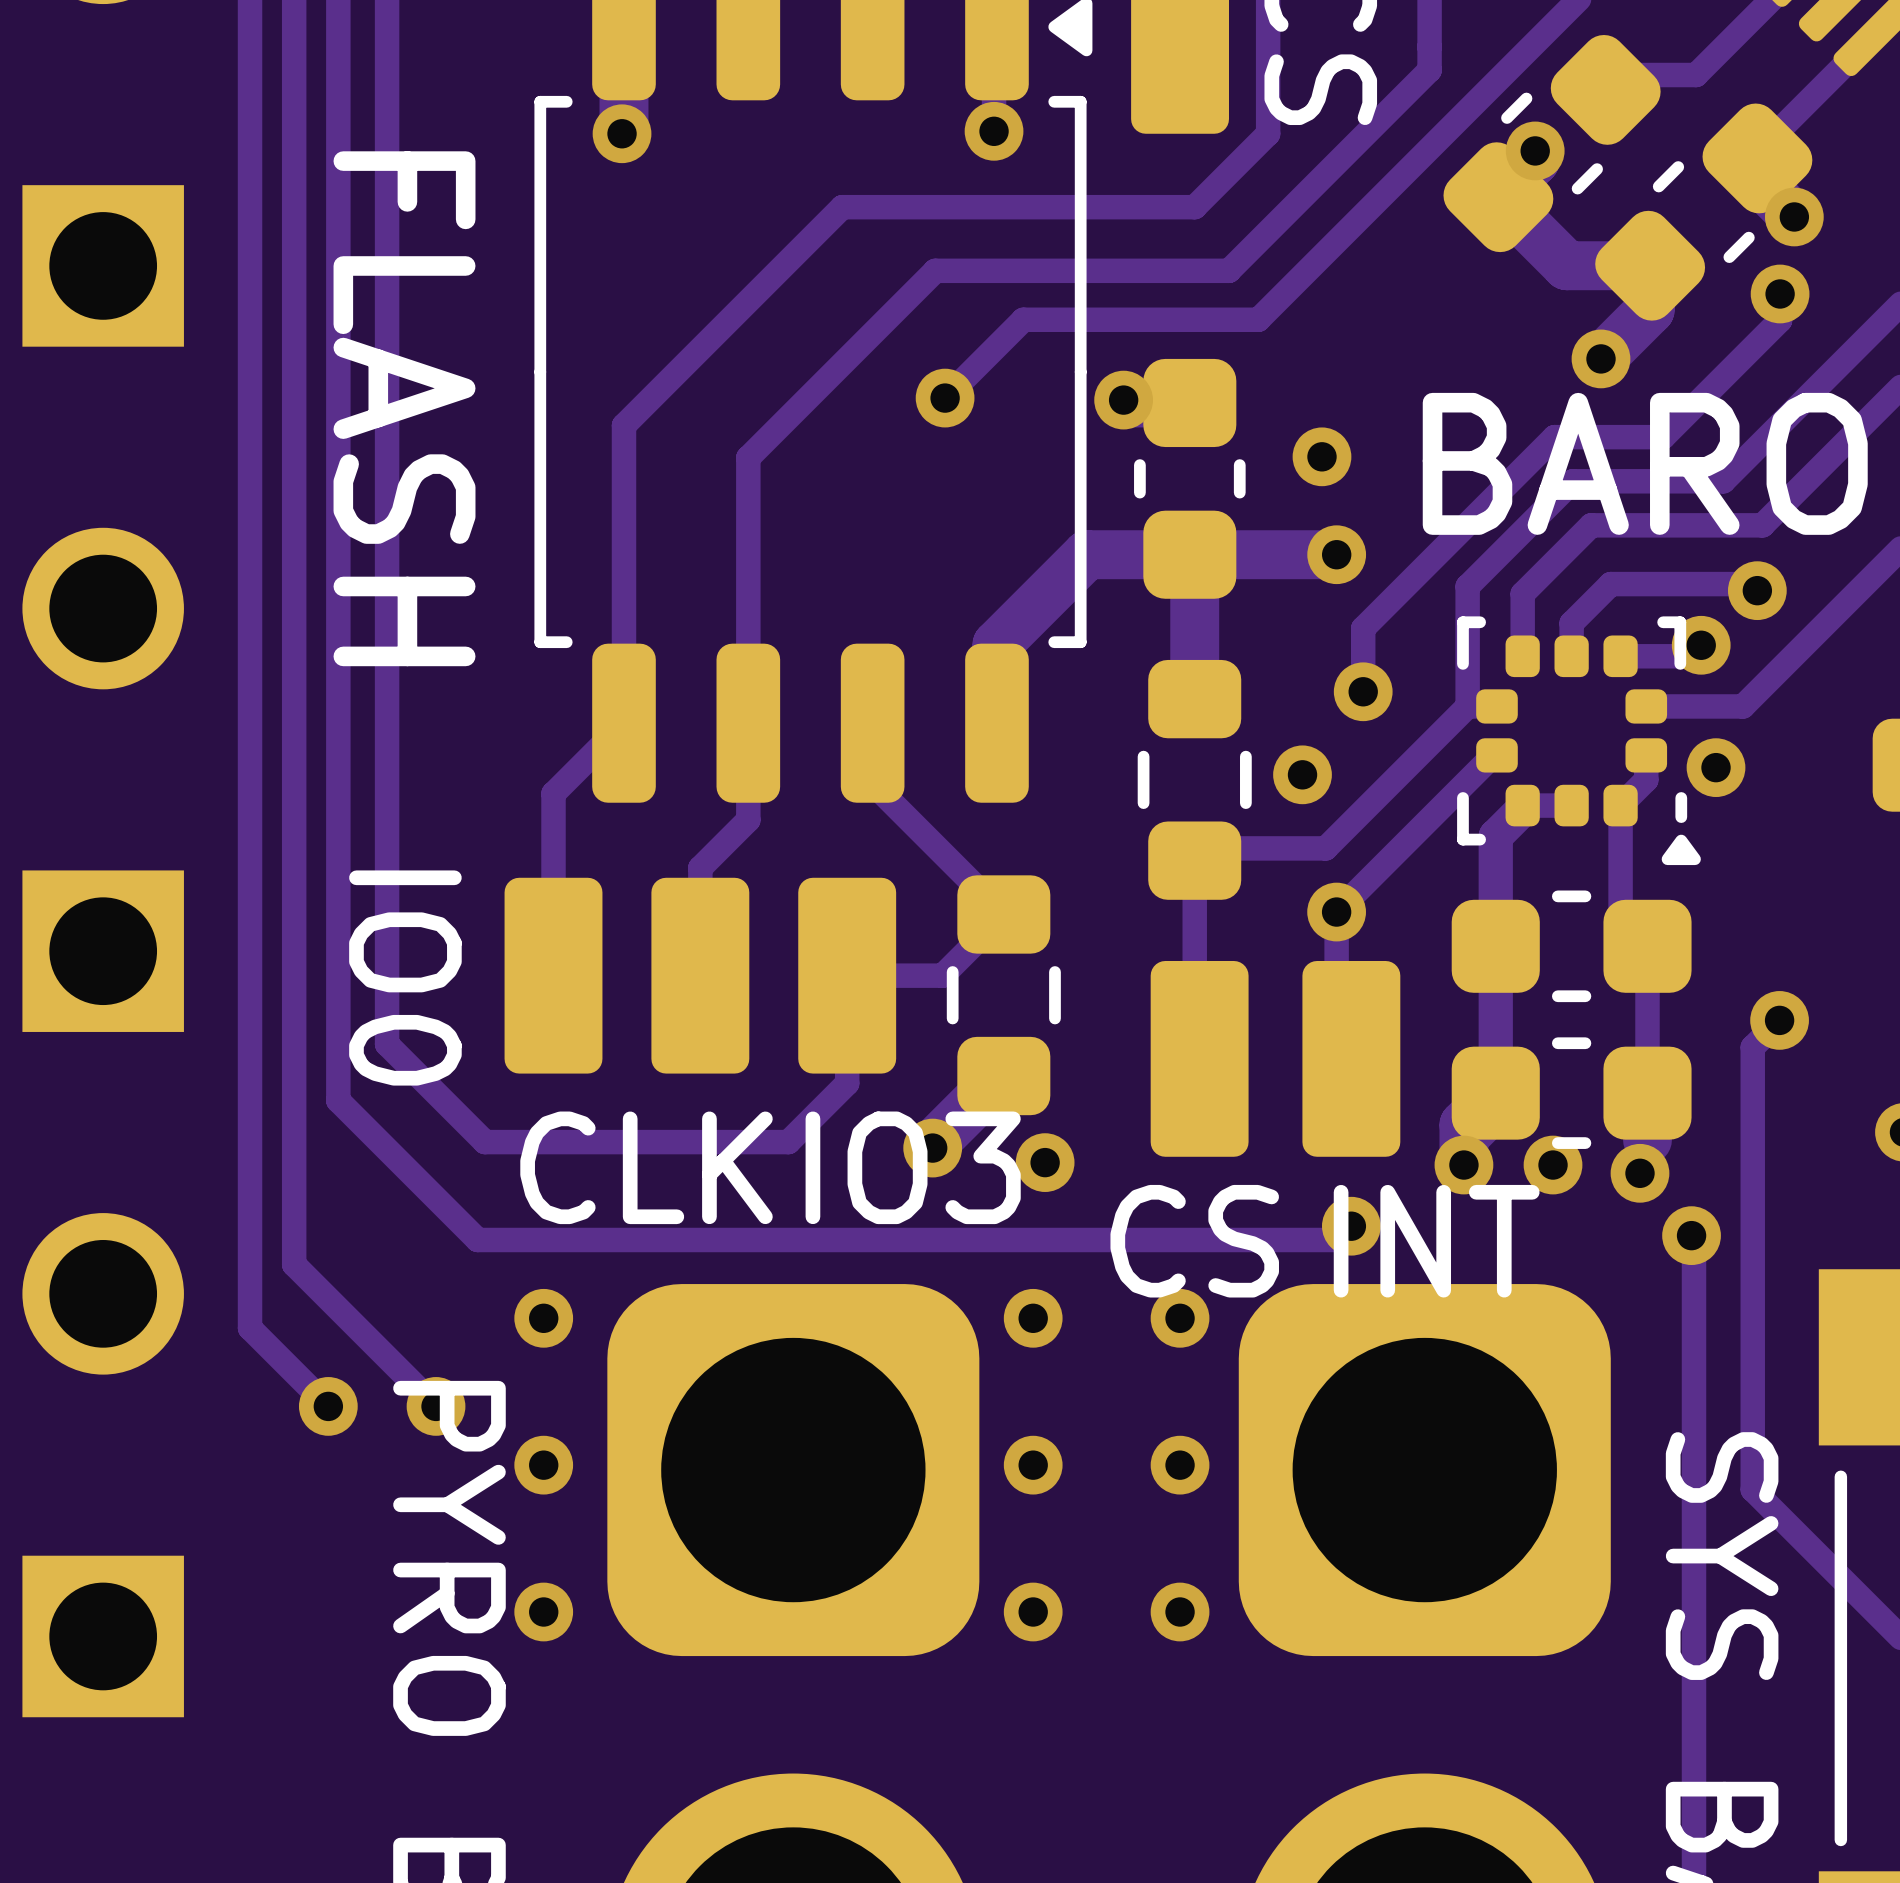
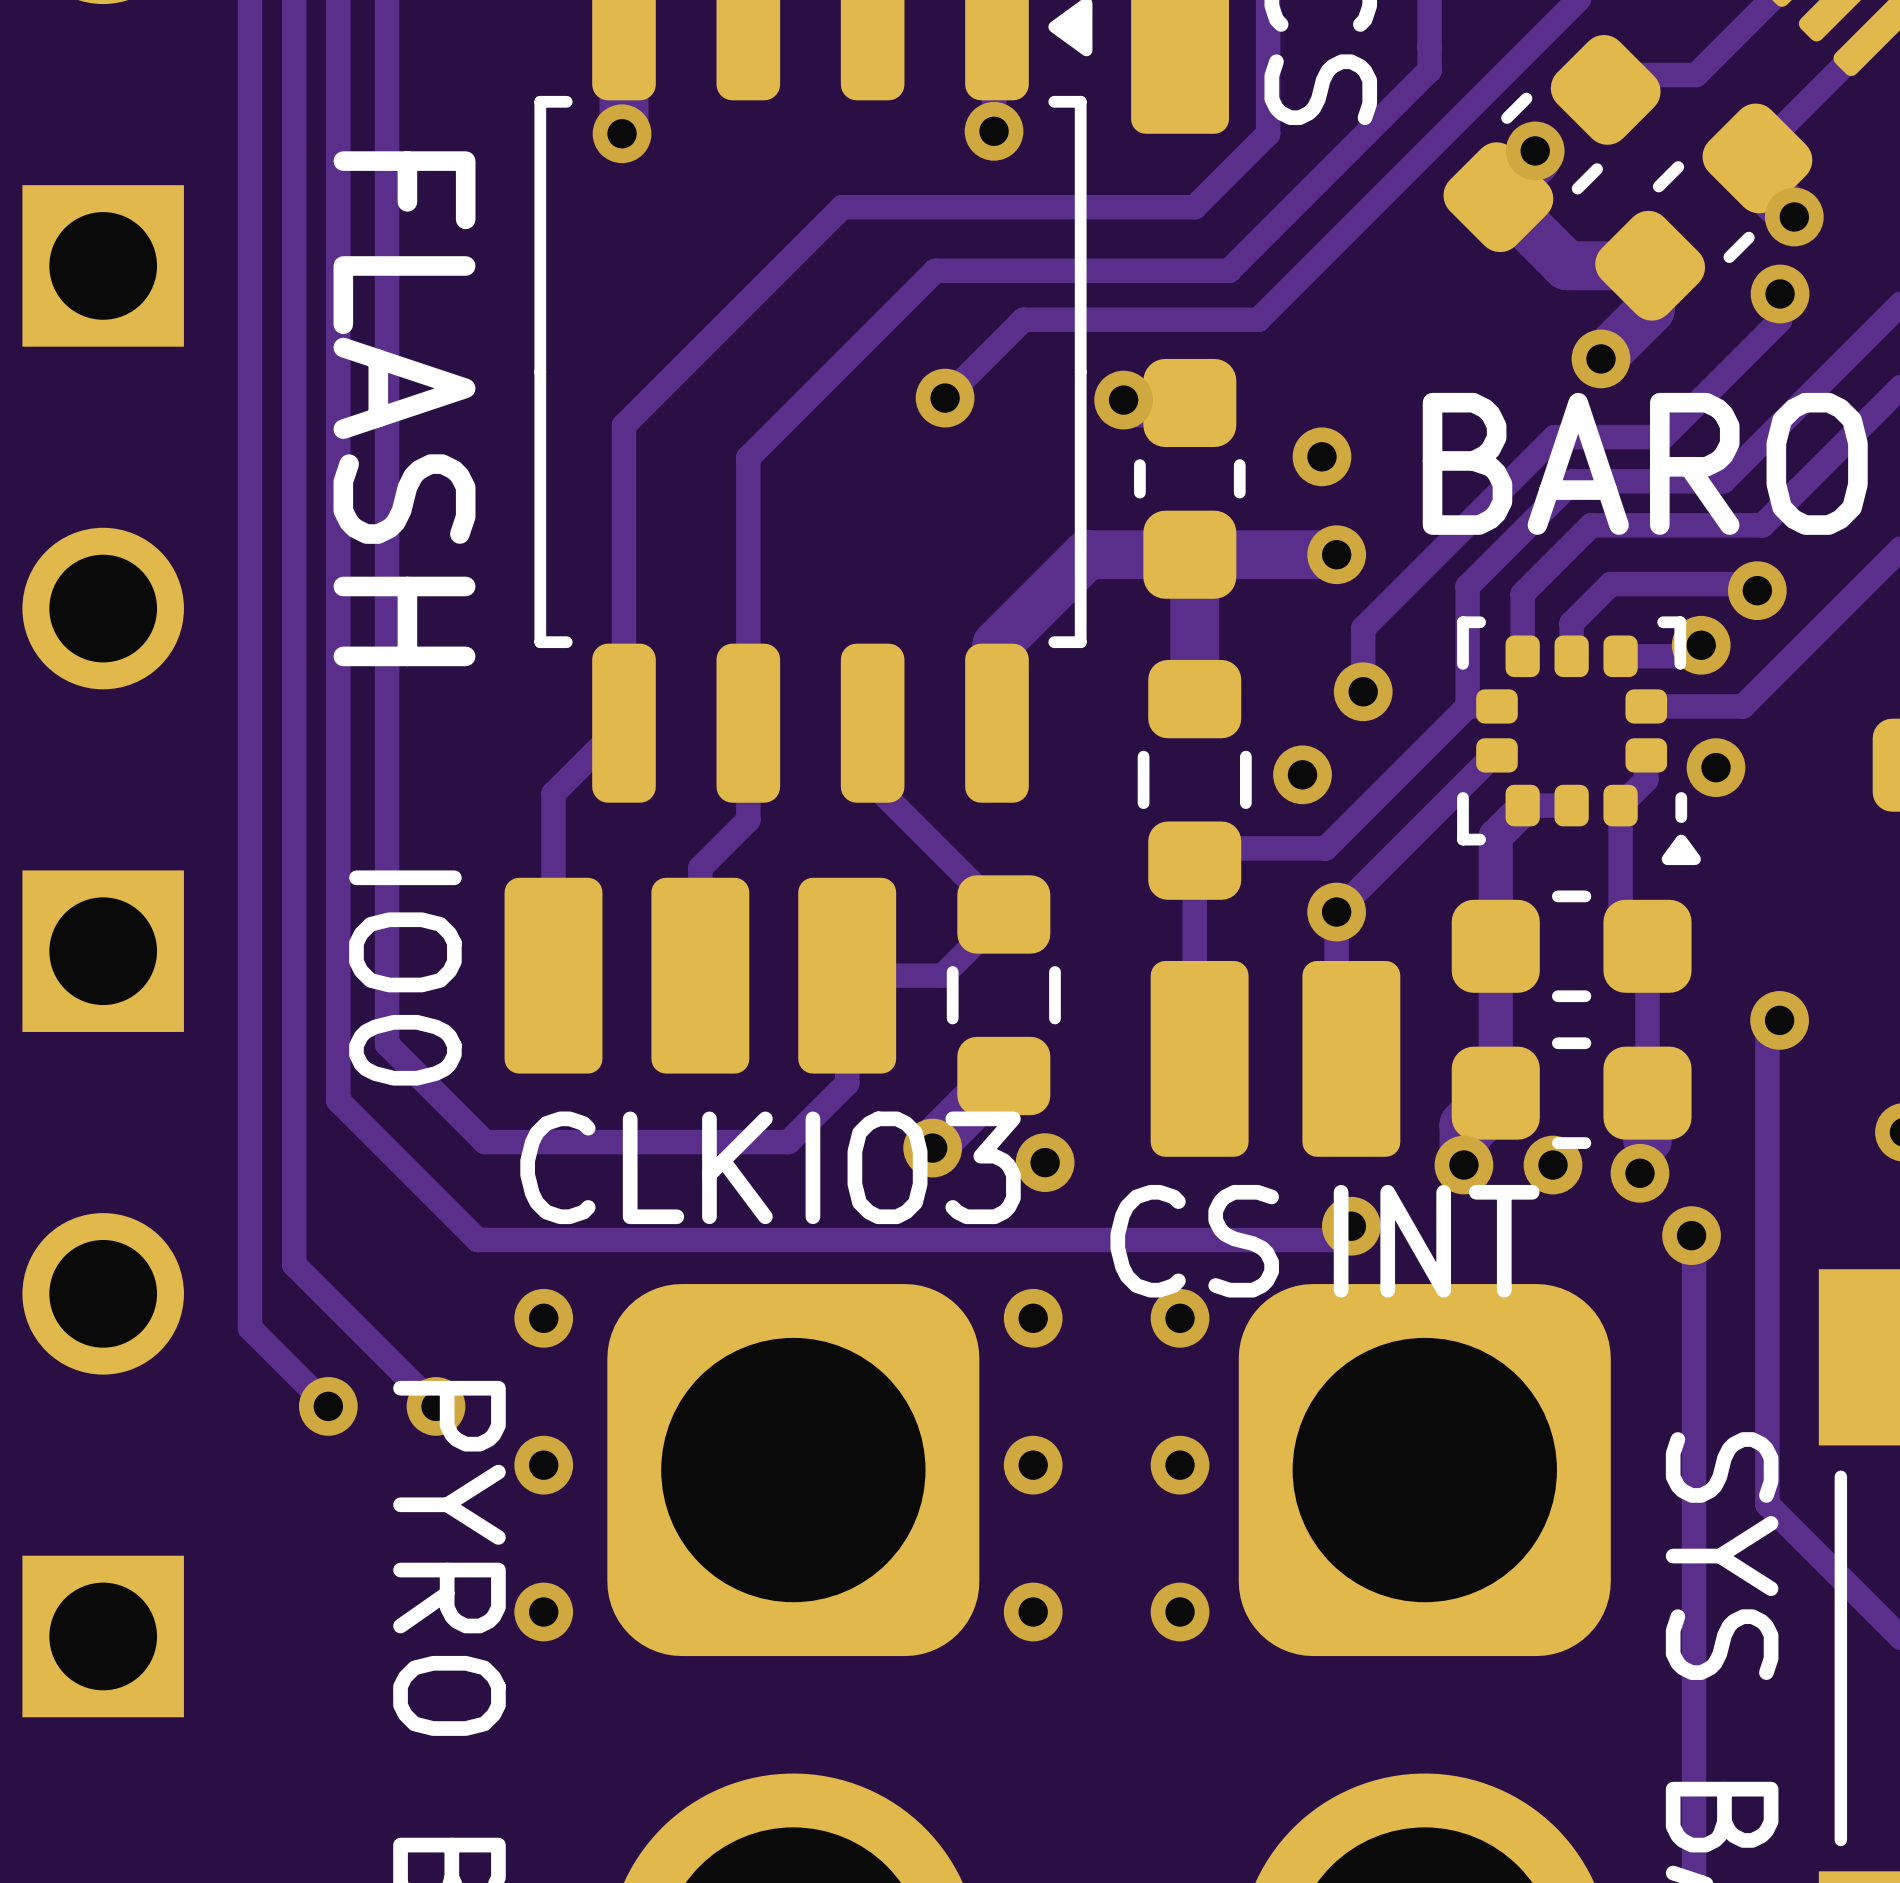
track: (1767, 1032) (1752, 1047) (1752, 1489) (1767, 1504) -> (1767, 1032) (1767, 1504)

